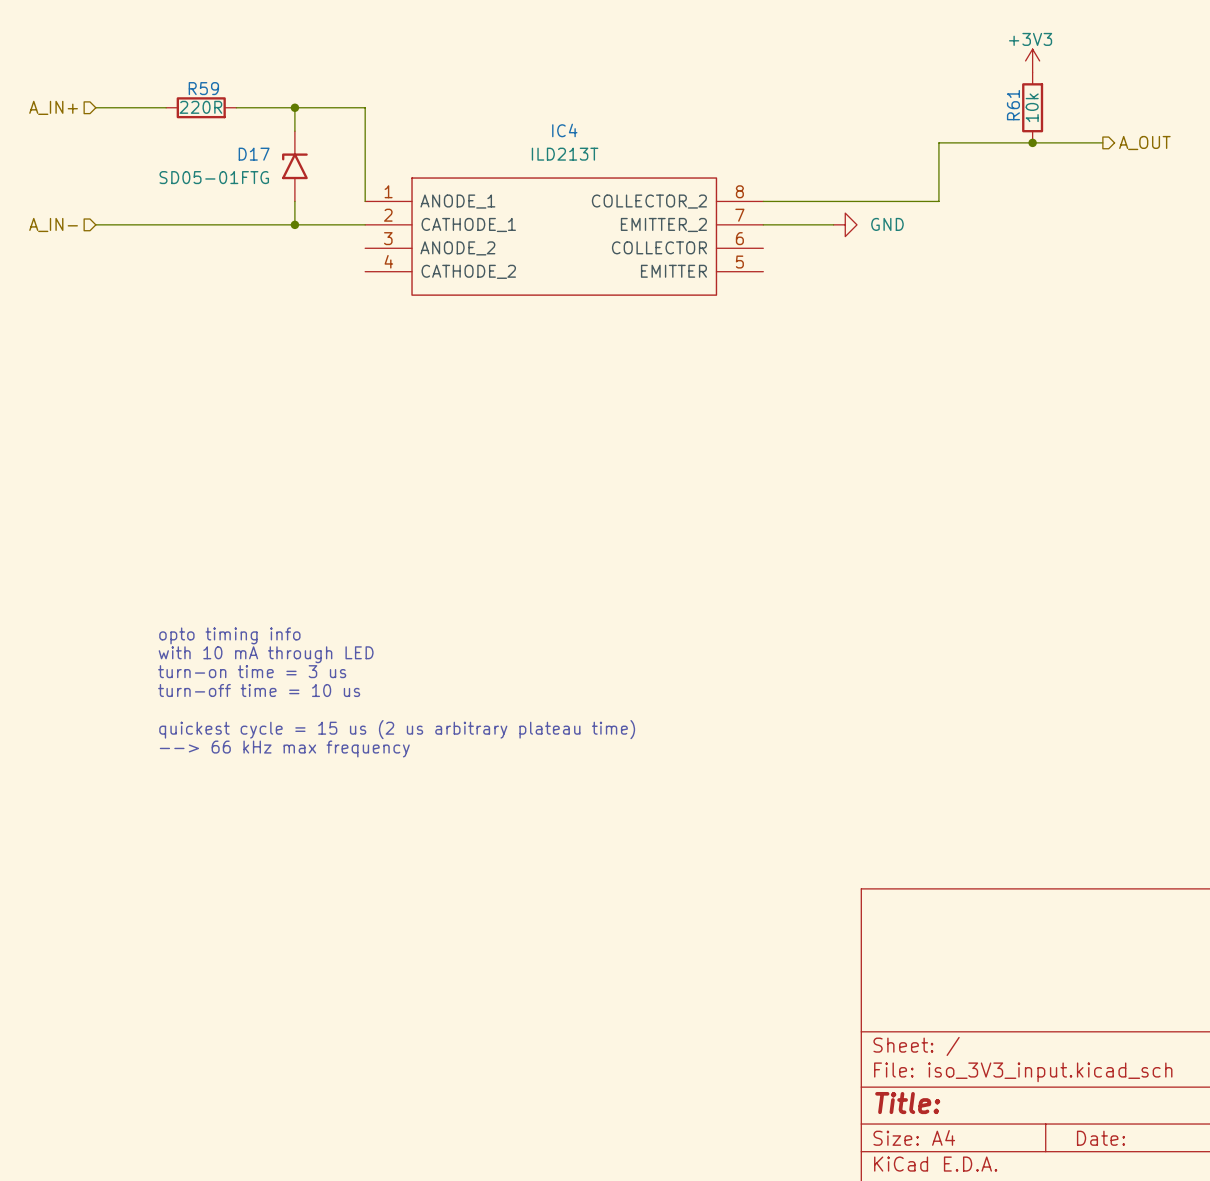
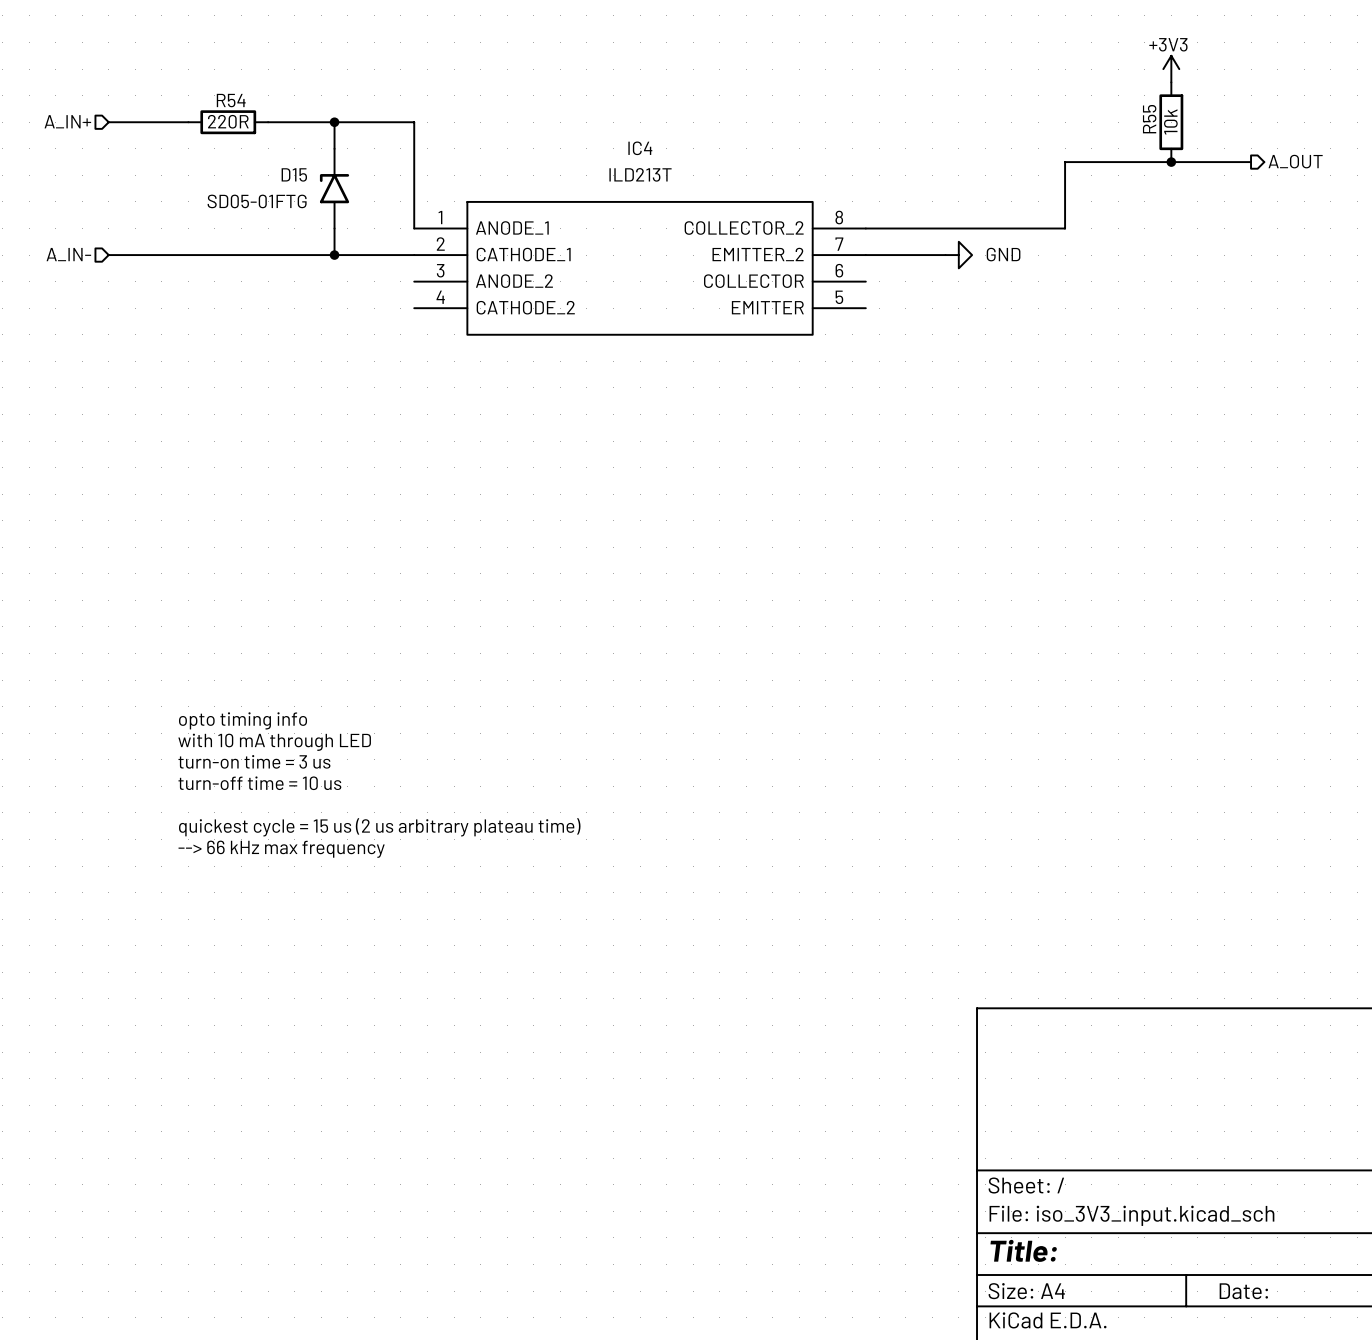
R59 name: R59 (203, 88) -> R54 (231, 100)
R61 name: R61 (1013, 105) -> R55 (1149, 119)
D17 name: D17 (254, 154) -> D15 (294, 174)

